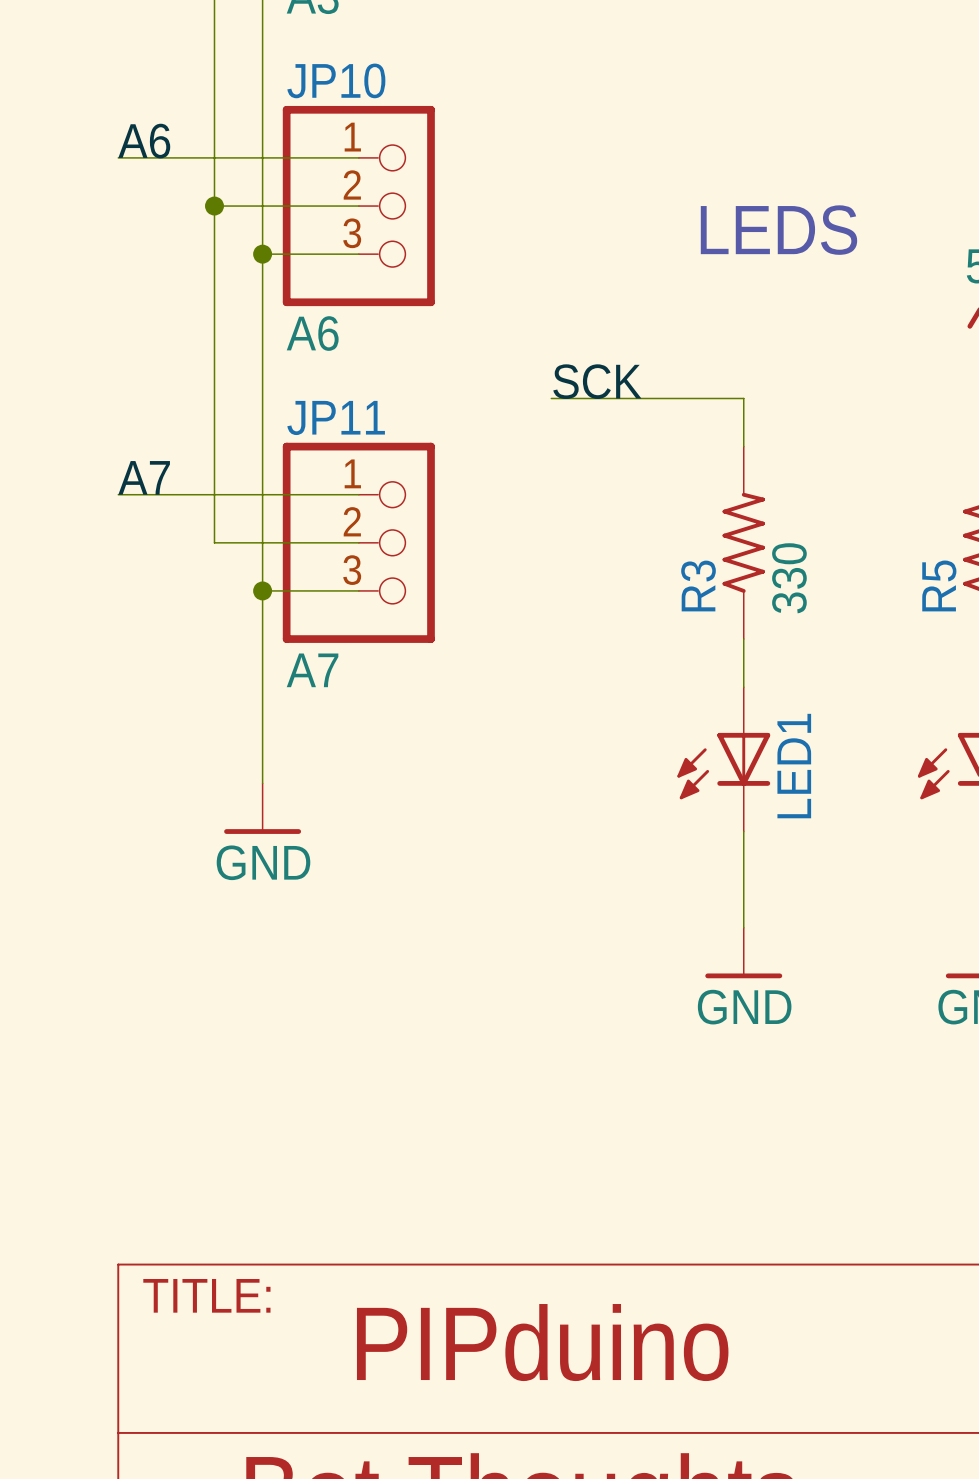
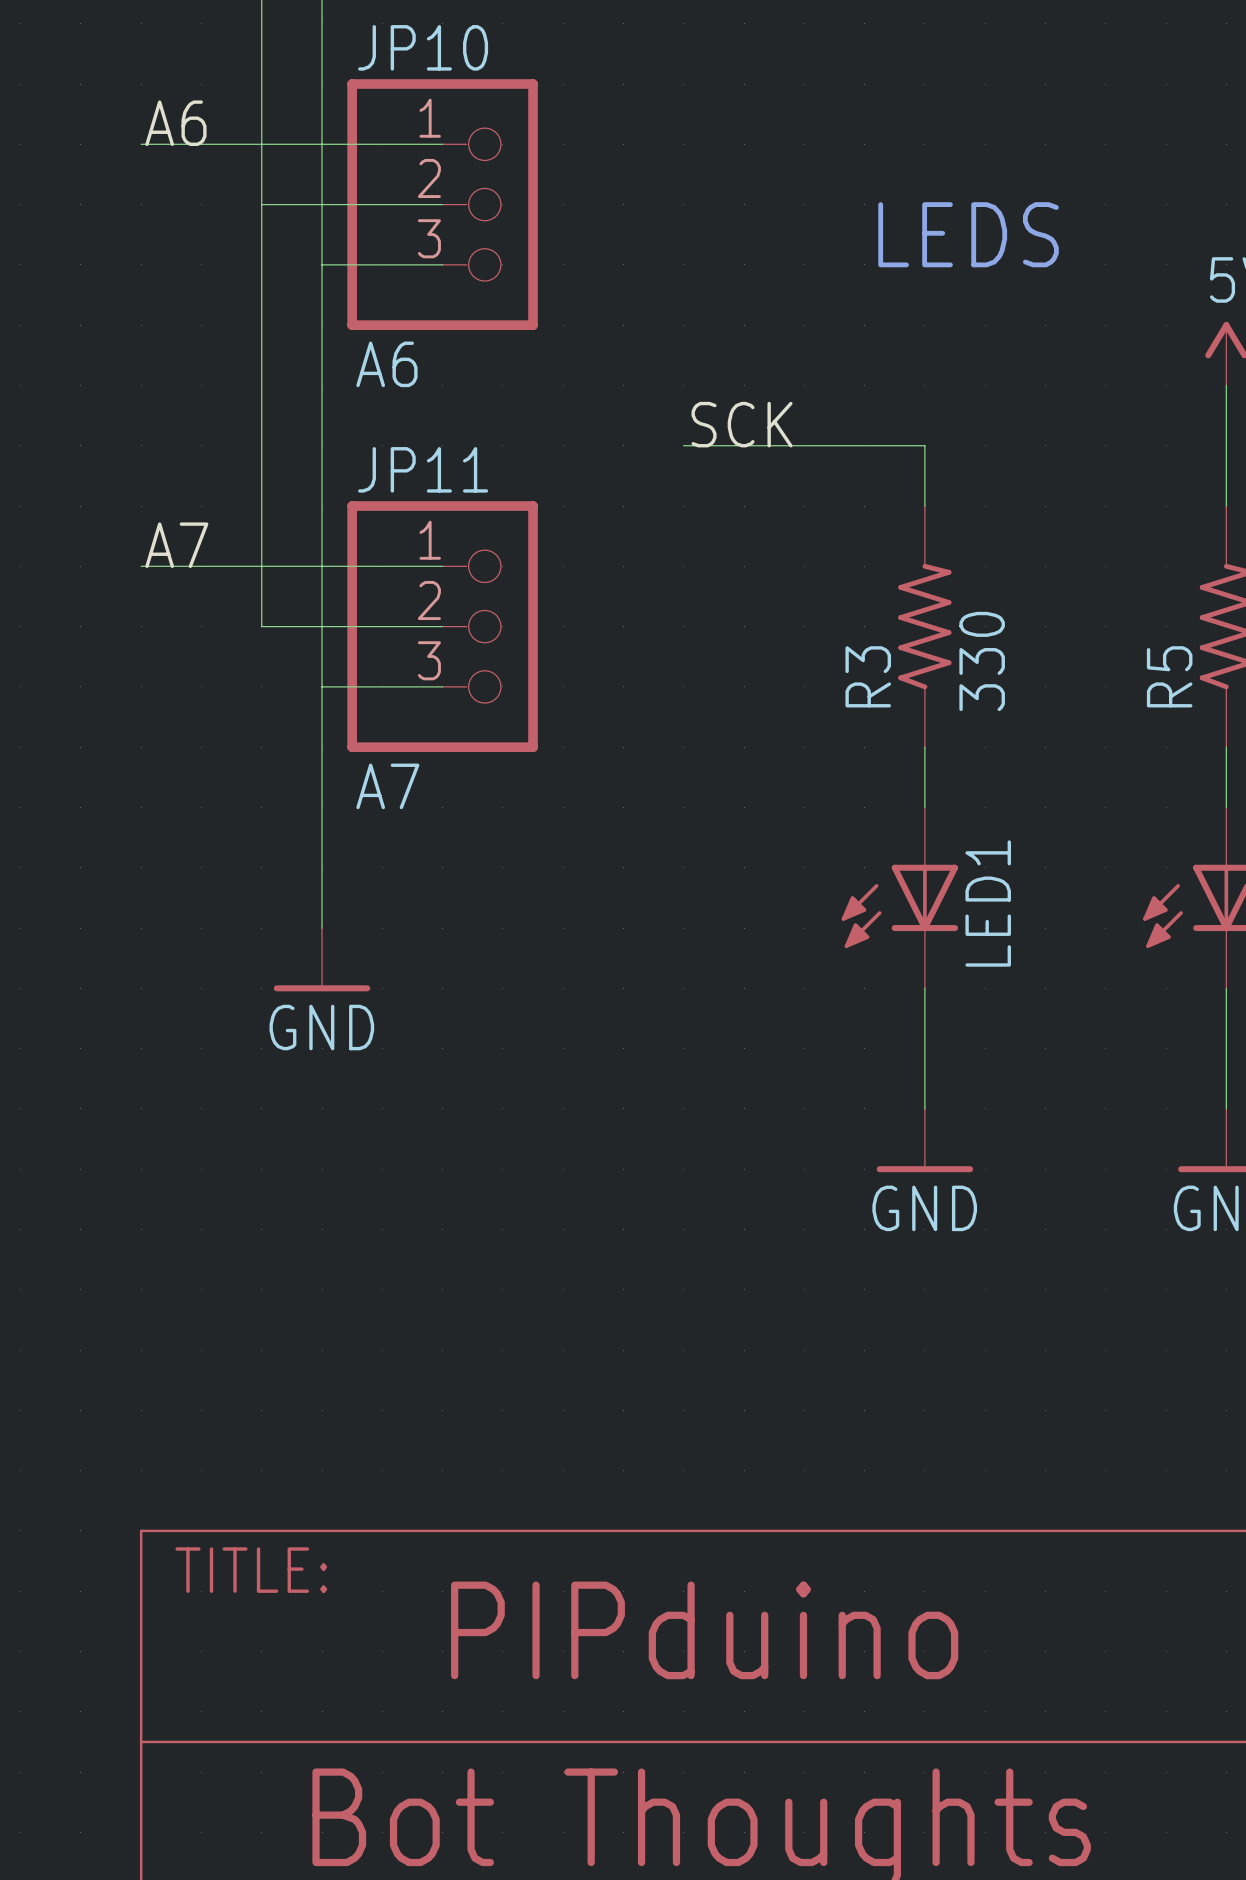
junction: (214, 206) -> none
junction: (262, 254) -> none
junction: (262, 590) -> none

